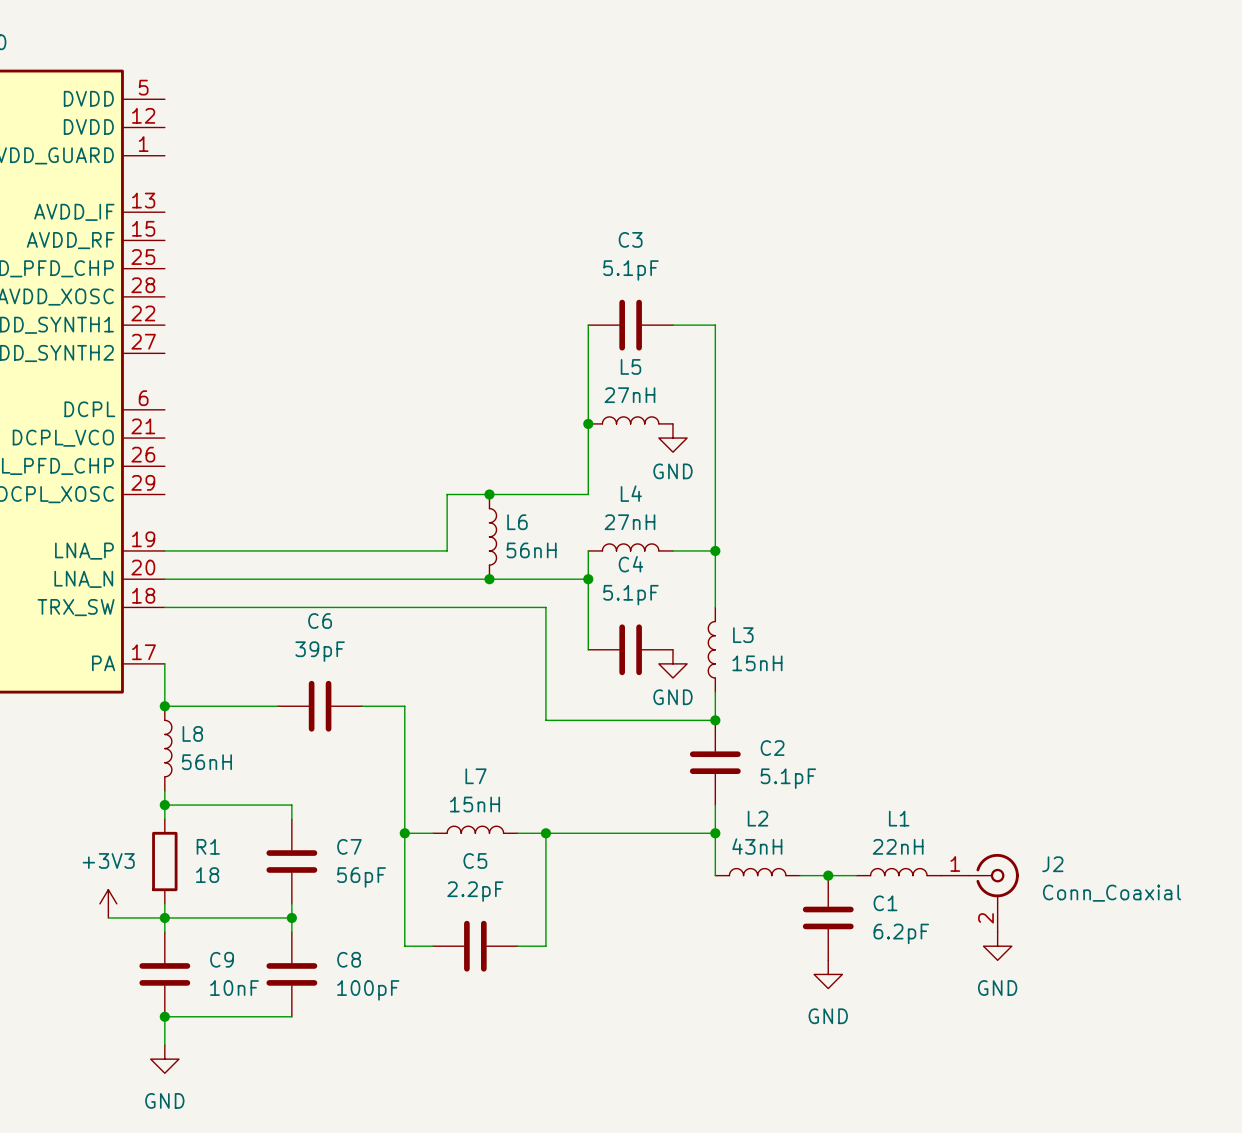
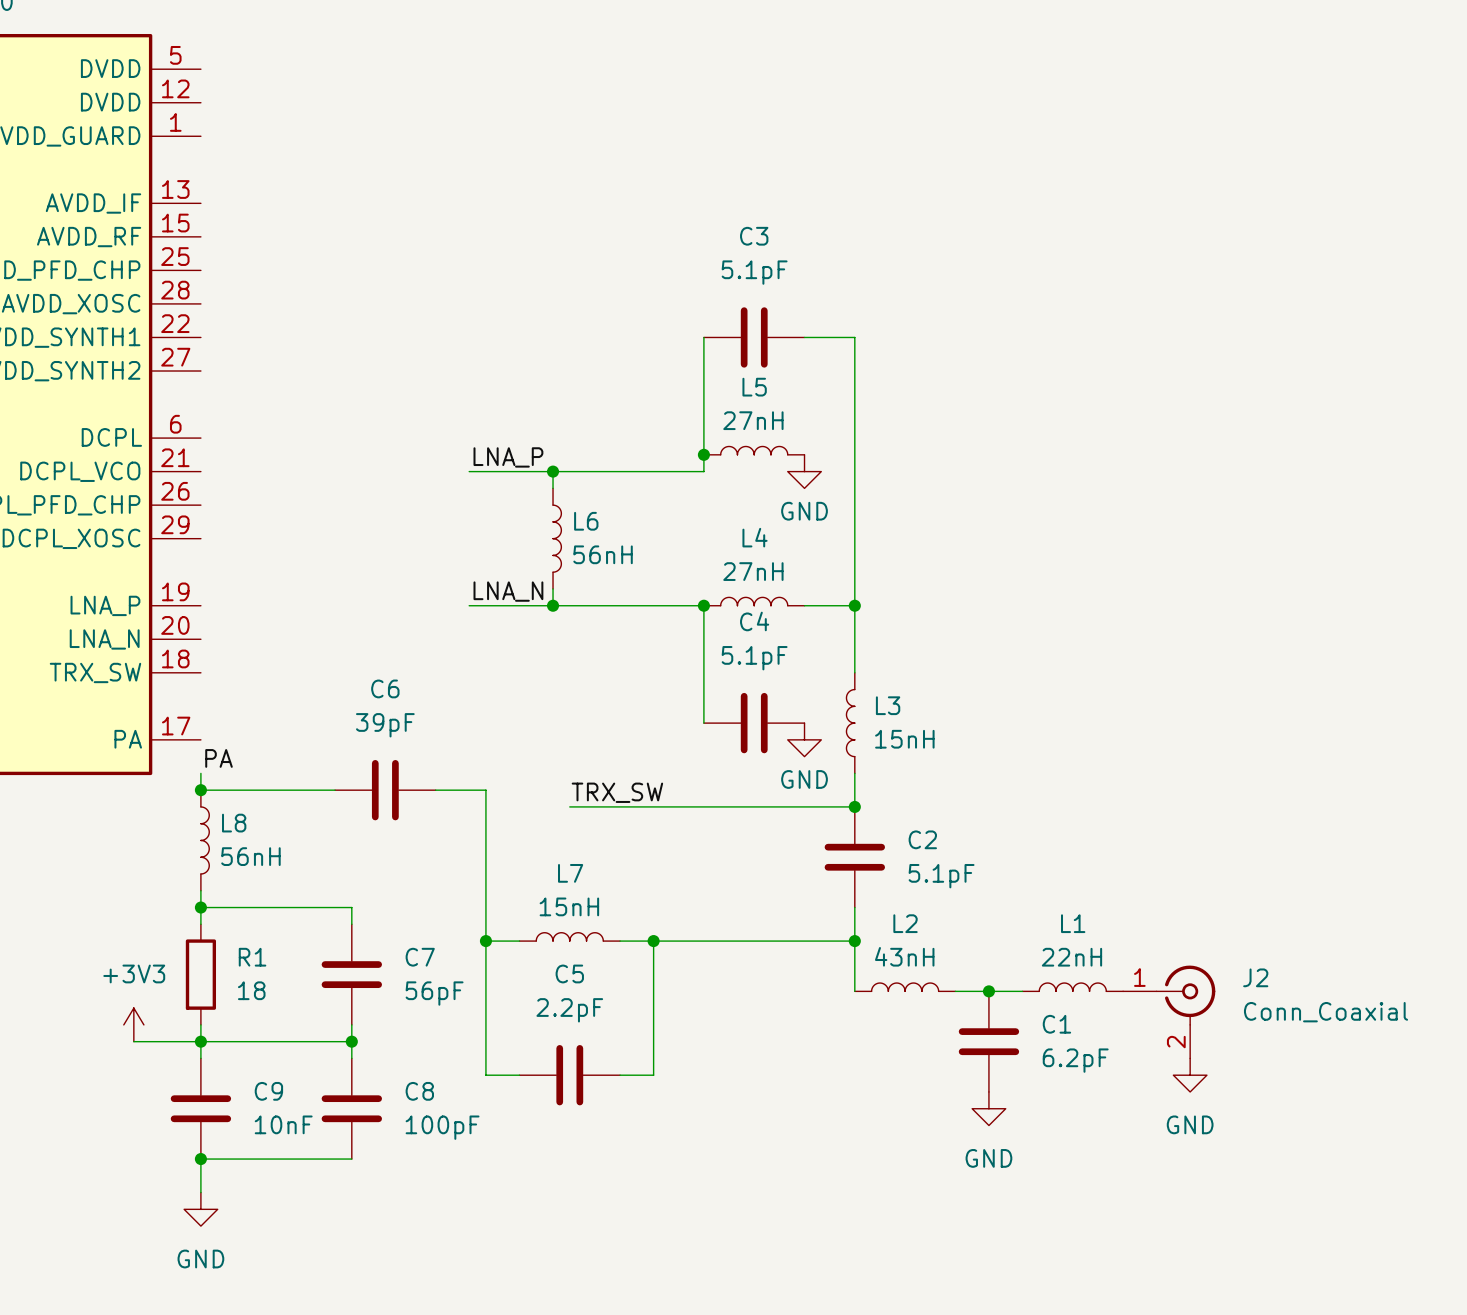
label: none -> LNA_P (508, 457)
wire: none -> (469, 471) (703, 471)
wire: none -> (553, 471) (553, 488)
junction: none -> (553, 471)
wire: (588, 438) (588, 494) (447, 494) (447, 550) -> (703, 605) (536, 605)
junction: (489, 494) -> none
wire: none -> (553, 588) (553, 605)
L6 position: (492, 536) -> (557, 538)
label: none -> LNA_N (508, 591)
wire: (164, 550) (390, 550) -> none
junction: none -> (553, 605)
wire: (164, 579) (588, 579) -> none
junction: (489, 579) -> none
junction position: (588, 579) -> (703, 605)
wire: (164, 607) (545, 607) (545, 720) -> (569, 806) (653, 806)
wire: (164, 663) (164, 692) -> none
label: none -> PA (219, 758)
label: none -> TRX_SW (617, 792)

